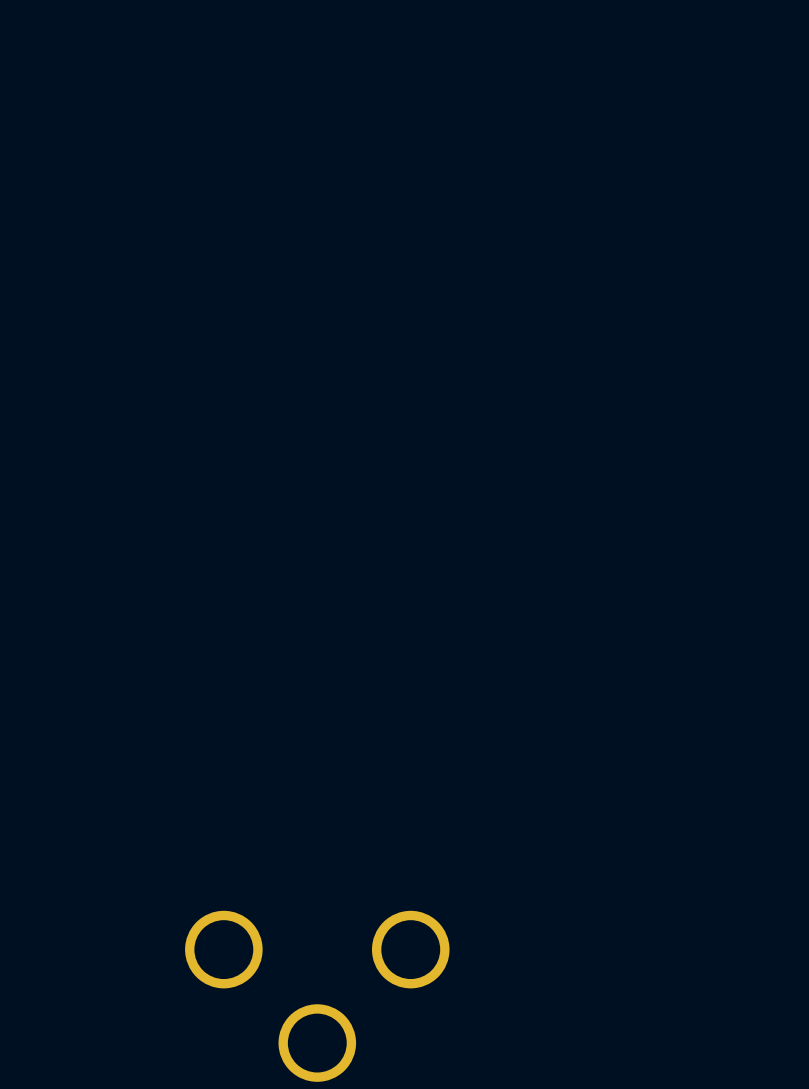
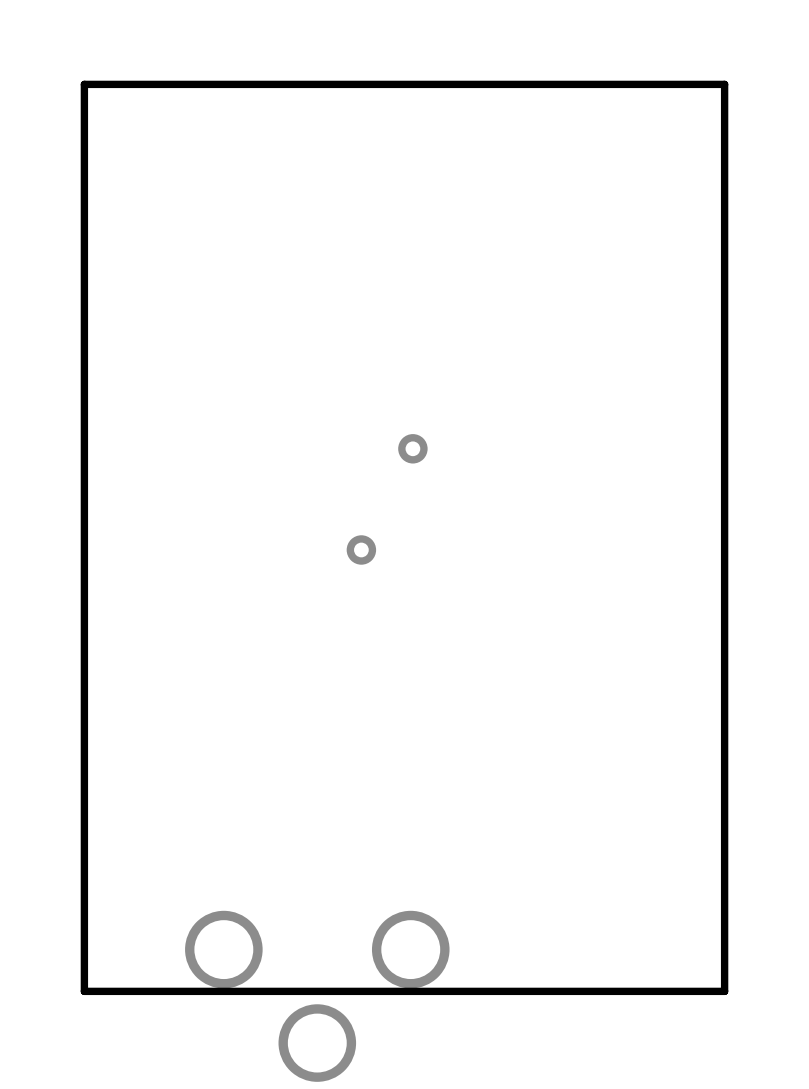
board edge: none -> (724, 84) (84, 84) (84, 991) (724, 991) (724, 84)
via: none -> (412, 448)
via: none -> (361, 549)

